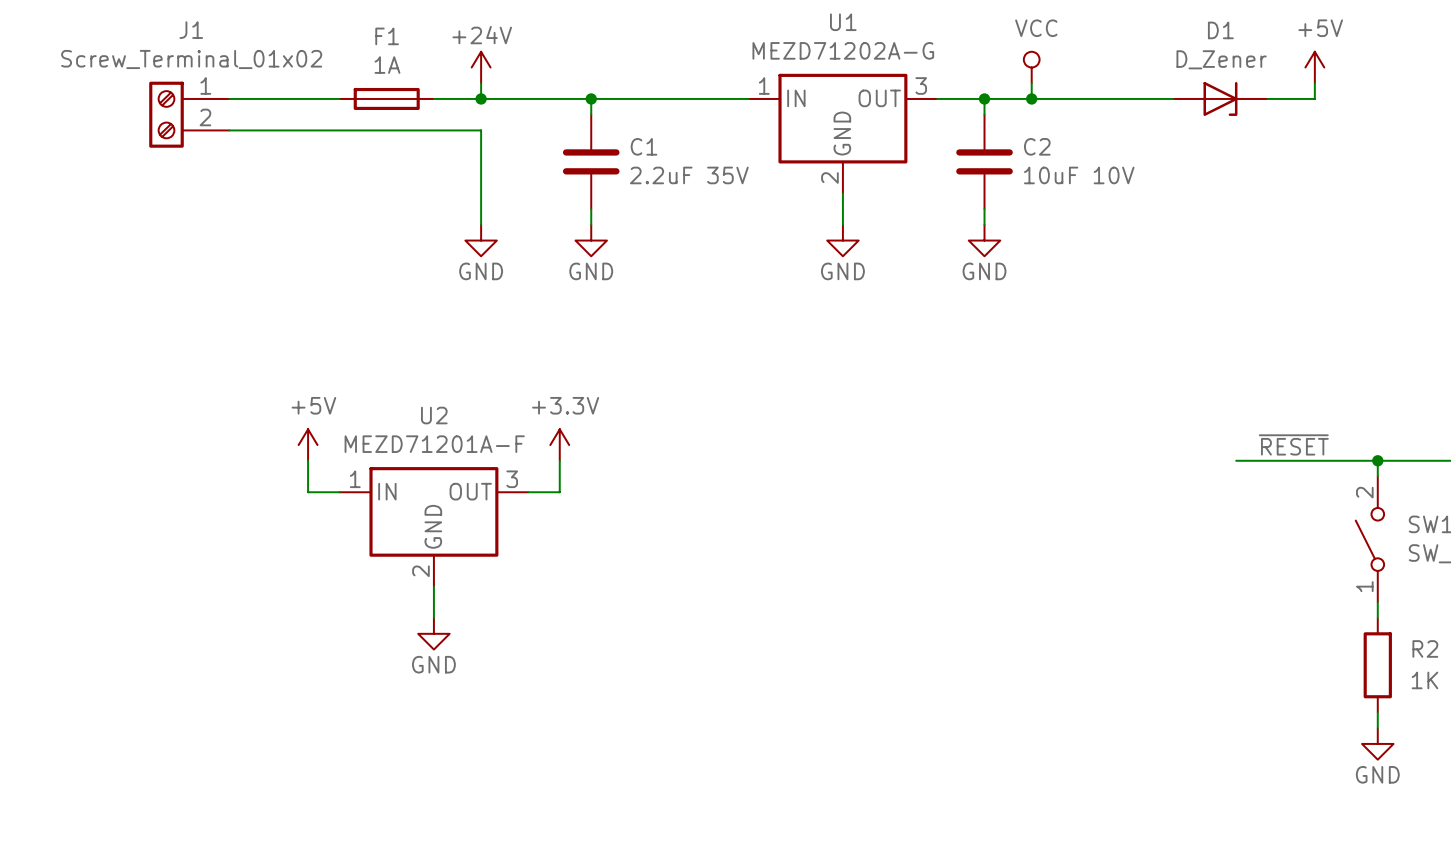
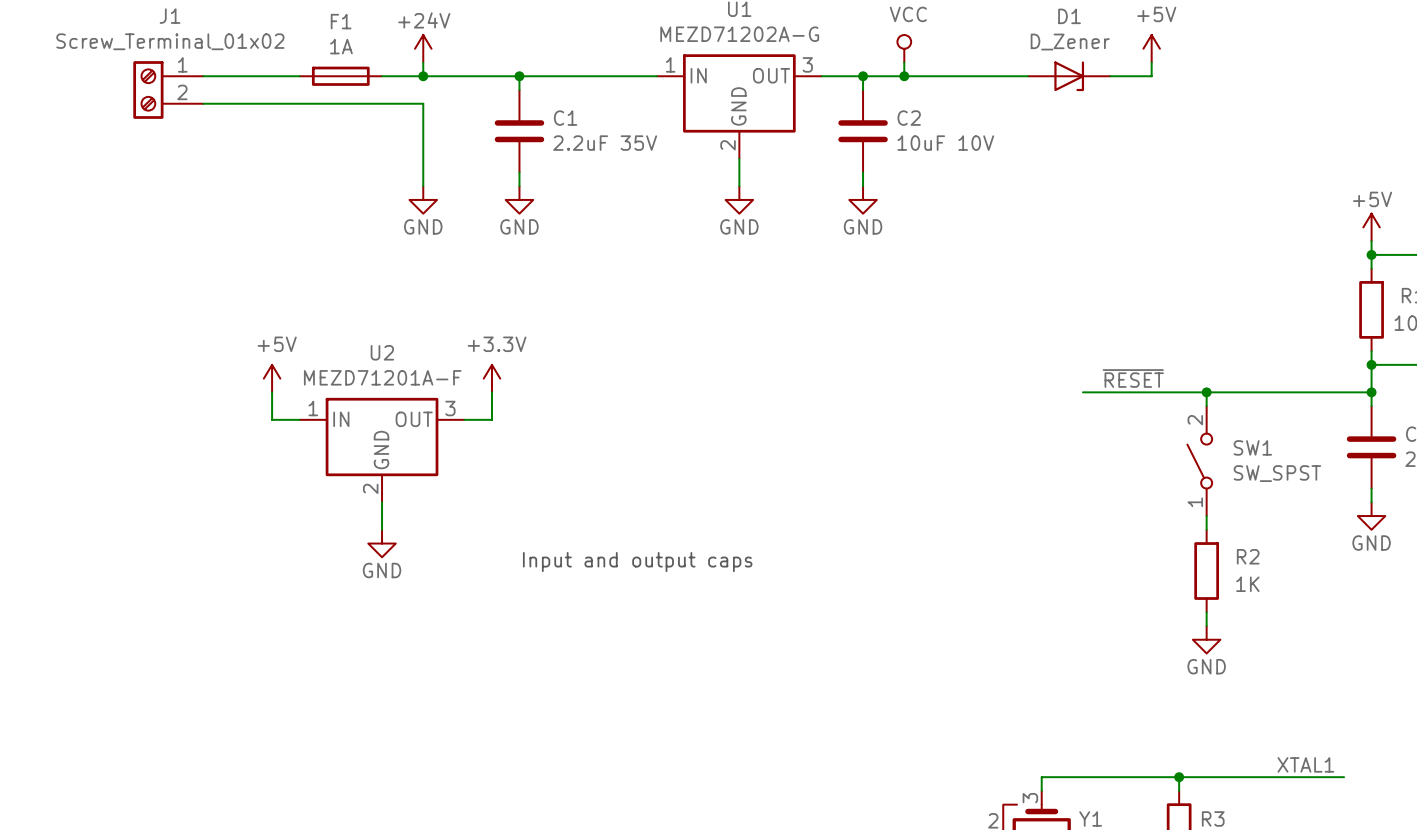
text: none -> Input and output caps (637, 562)

